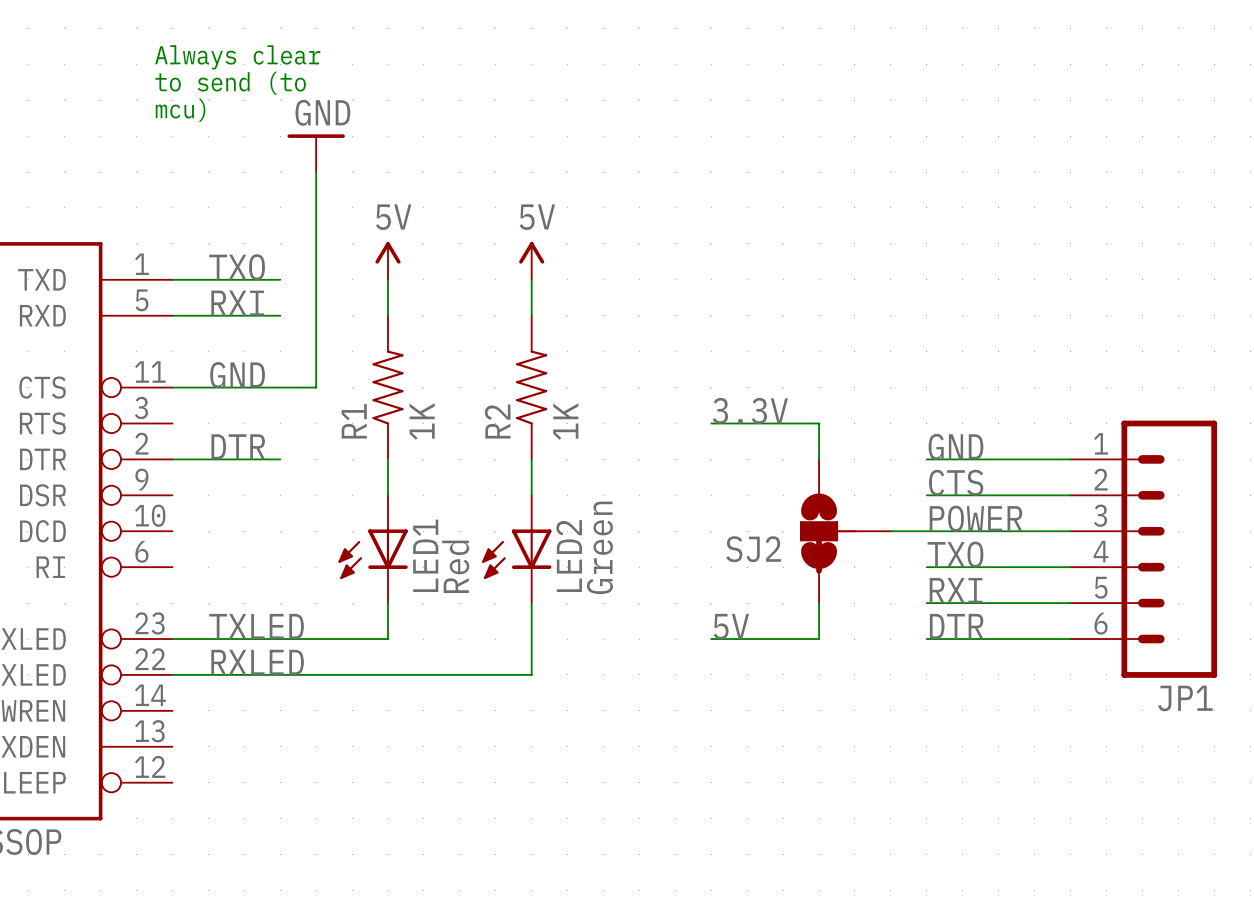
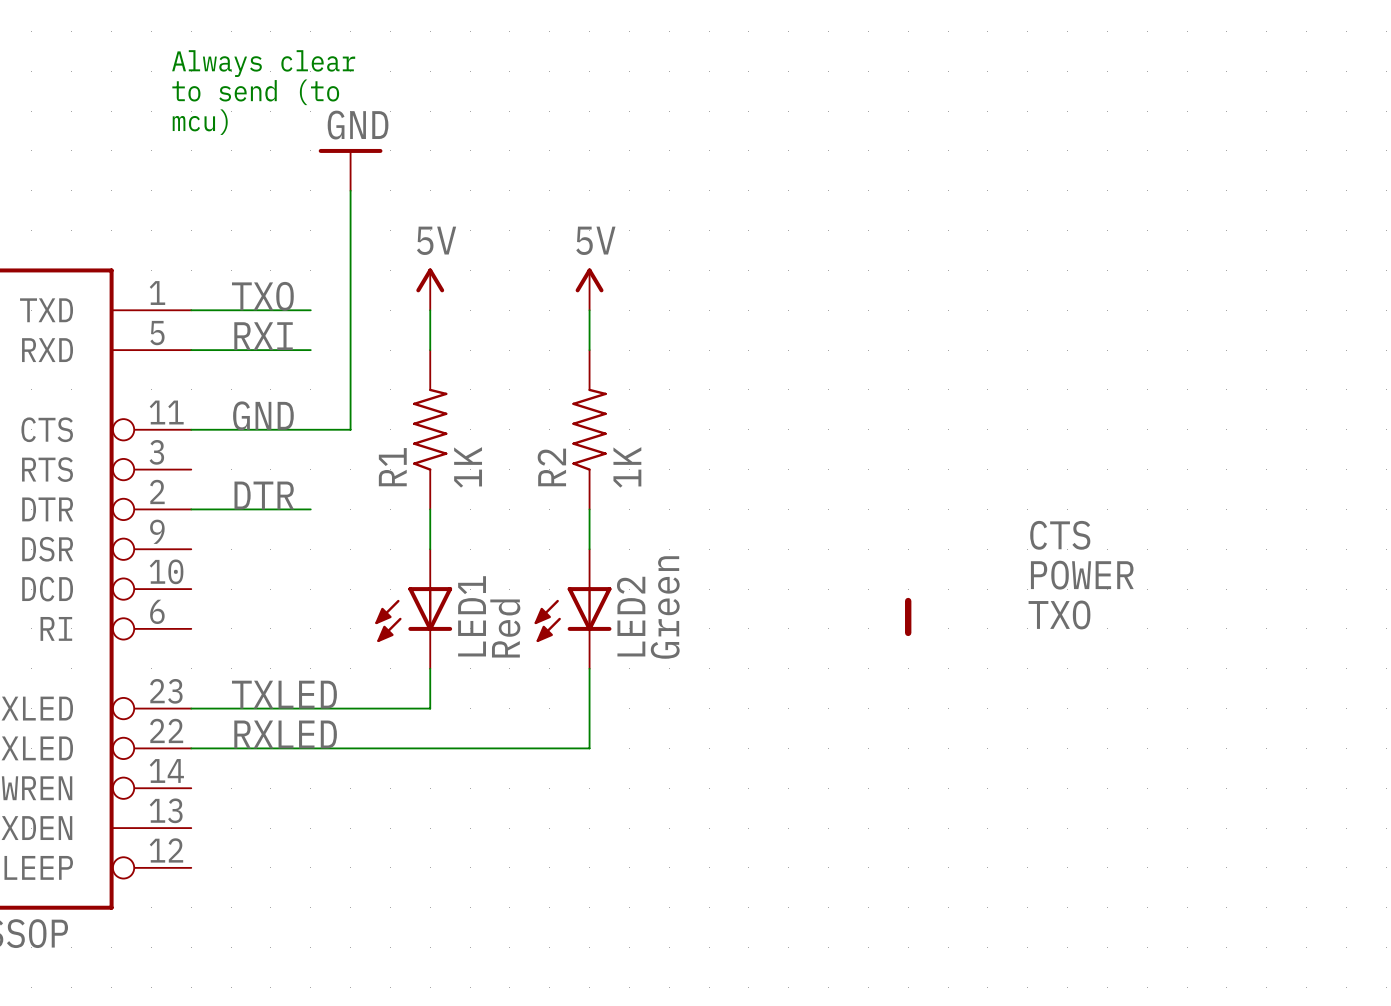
label: 3.3V (750, 410) -> none
wire: (711, 423) (819, 423) (819, 459) -> none
label: GND (955, 446) -> none
wire: (926, 459) (1070, 459) -> none
wire: (926, 495) (1070, 495) -> none
SJ2: (845, 531) -> none
wire: (890, 531) (1070, 531) -> none
JP1: (1143, 549) -> none
wire: (926, 567) (1070, 567) -> none
label: RXI (956, 590) -> none
wire: (819, 603) (819, 639) (711, 639) -> none
wire: (926, 603) (1070, 603) -> none
label: 5V (731, 626) -> none
label: DTR (956, 626) -> none
wire: (926, 639) (1070, 639) -> none

